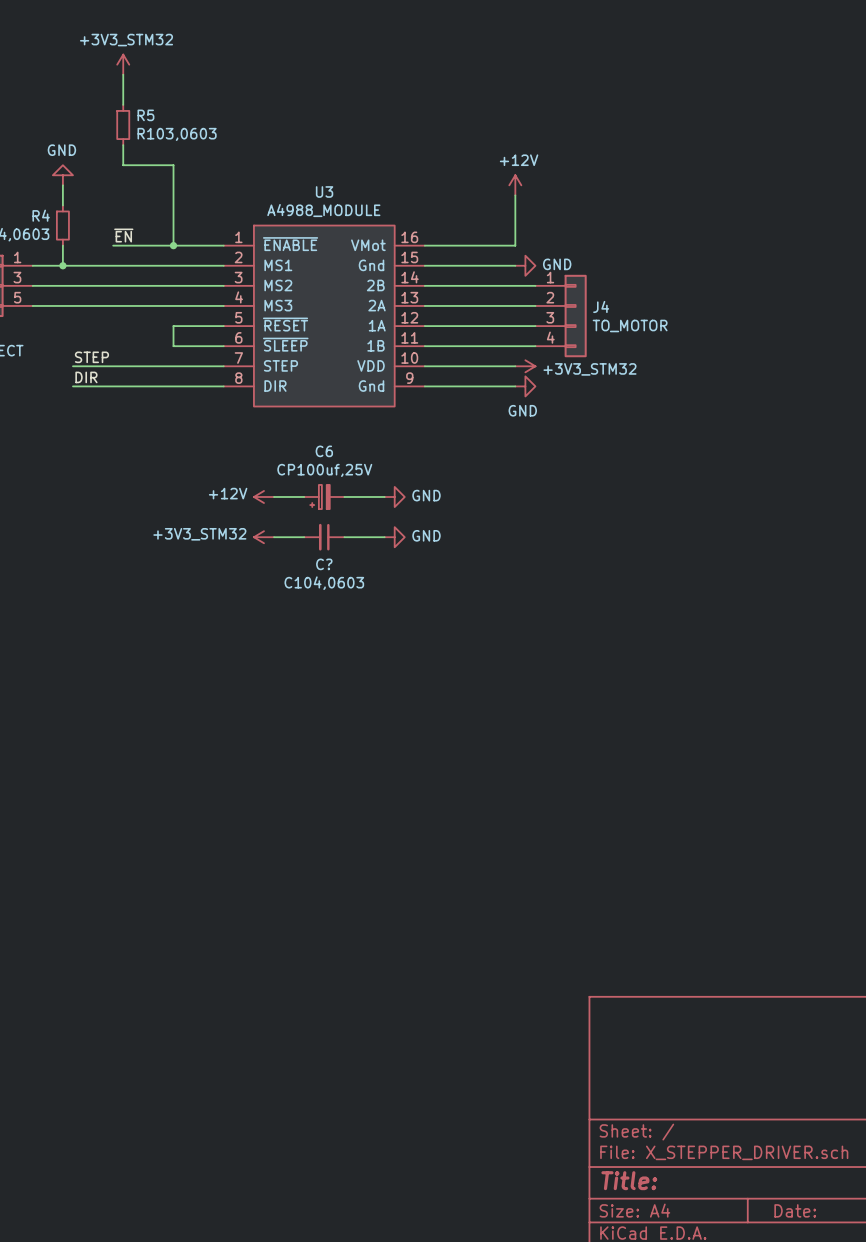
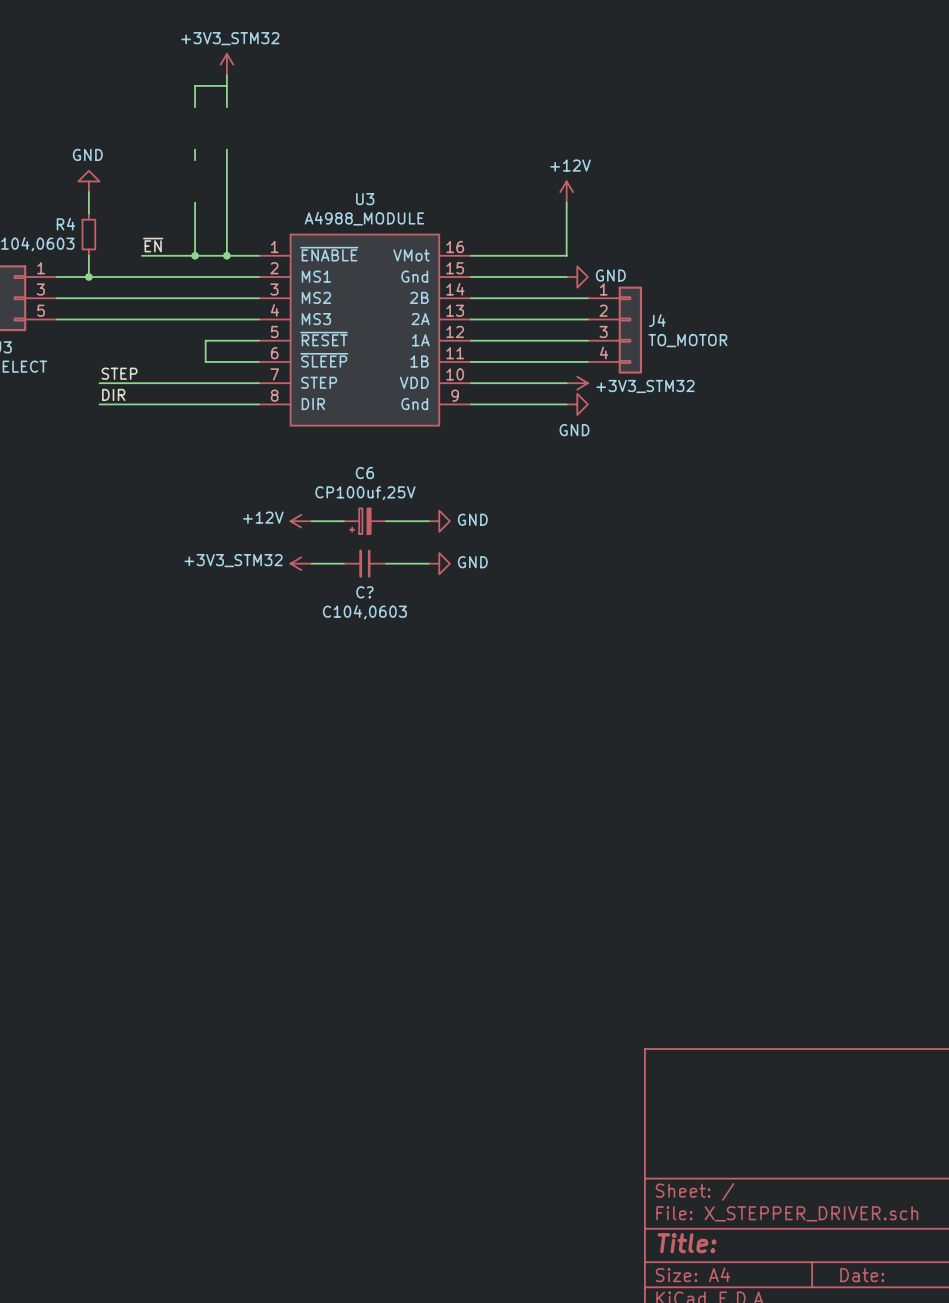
power symbol position: +3V3_STM32 (123, 64) -> +3V3_STM32 (226, 64)
wire: (123, 74) (123, 104) -> (226, 75) (226, 107)
wire: none -> (226, 85) (195, 85) (195, 107)
R5: R103,0603 (123, 125) -> none
wire: (123, 145) (123, 165) (173, 165) (173, 245) -> none
wire: none -> (195, 149) (195, 160)
wire: none -> (226, 149) (226, 255)
wire: none -> (195, 202) (195, 255)
junction: none -> (195, 255)
junction: (173, 245) -> none
junction: none -> (226, 255)

